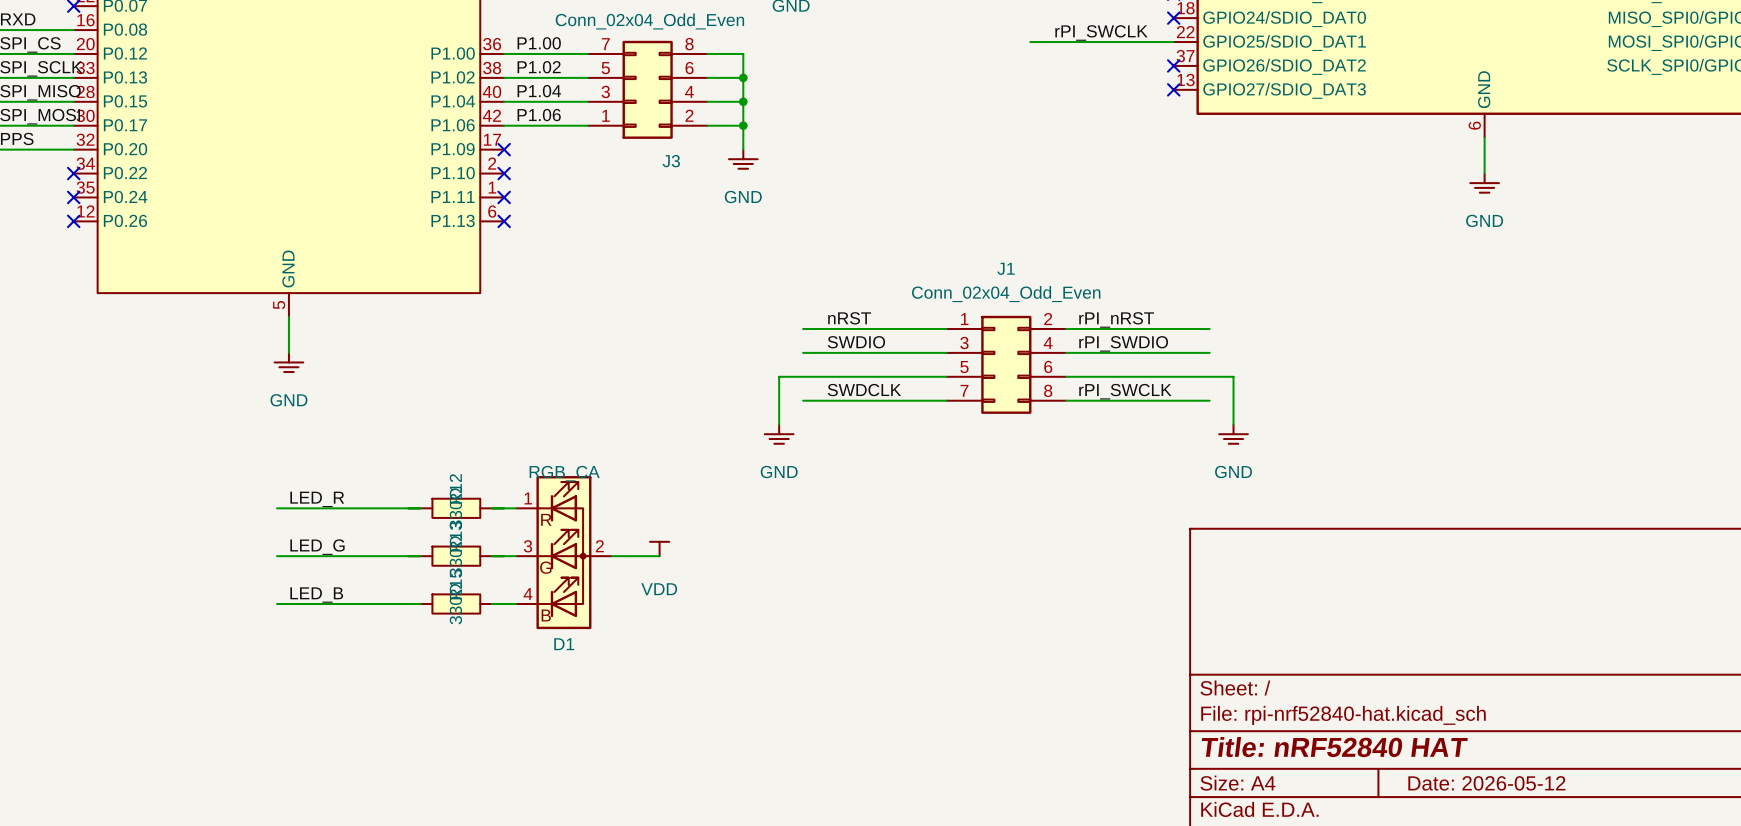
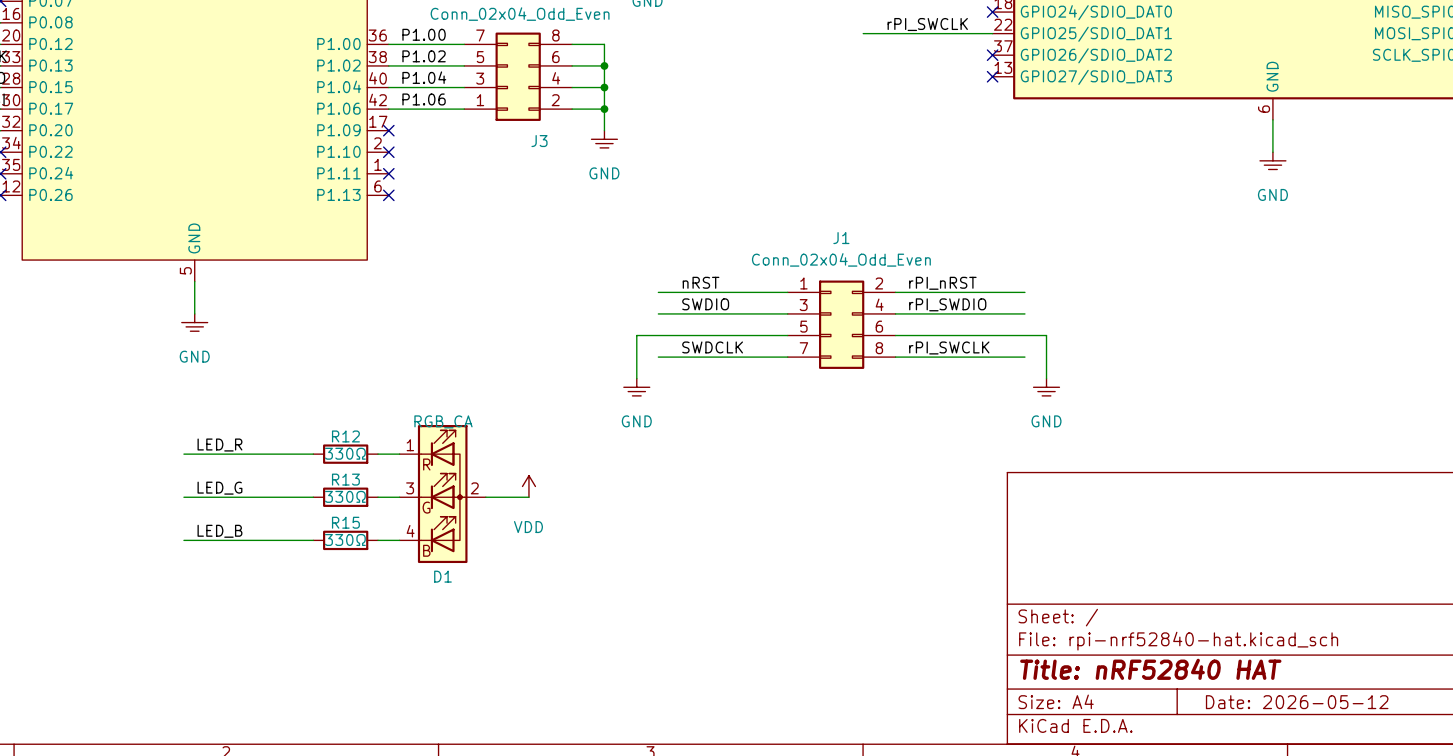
R12 symbol: [408, 498, 505, 518] -> [313, 444, 379, 464]
power symbol shape: [650, 541, 670, 557] -> [522, 475, 536, 498]
R13 symbol: [408, 546, 505, 566] -> [313, 487, 379, 507]
R15 symbol: [408, 594, 505, 614] -> [313, 530, 379, 551]

